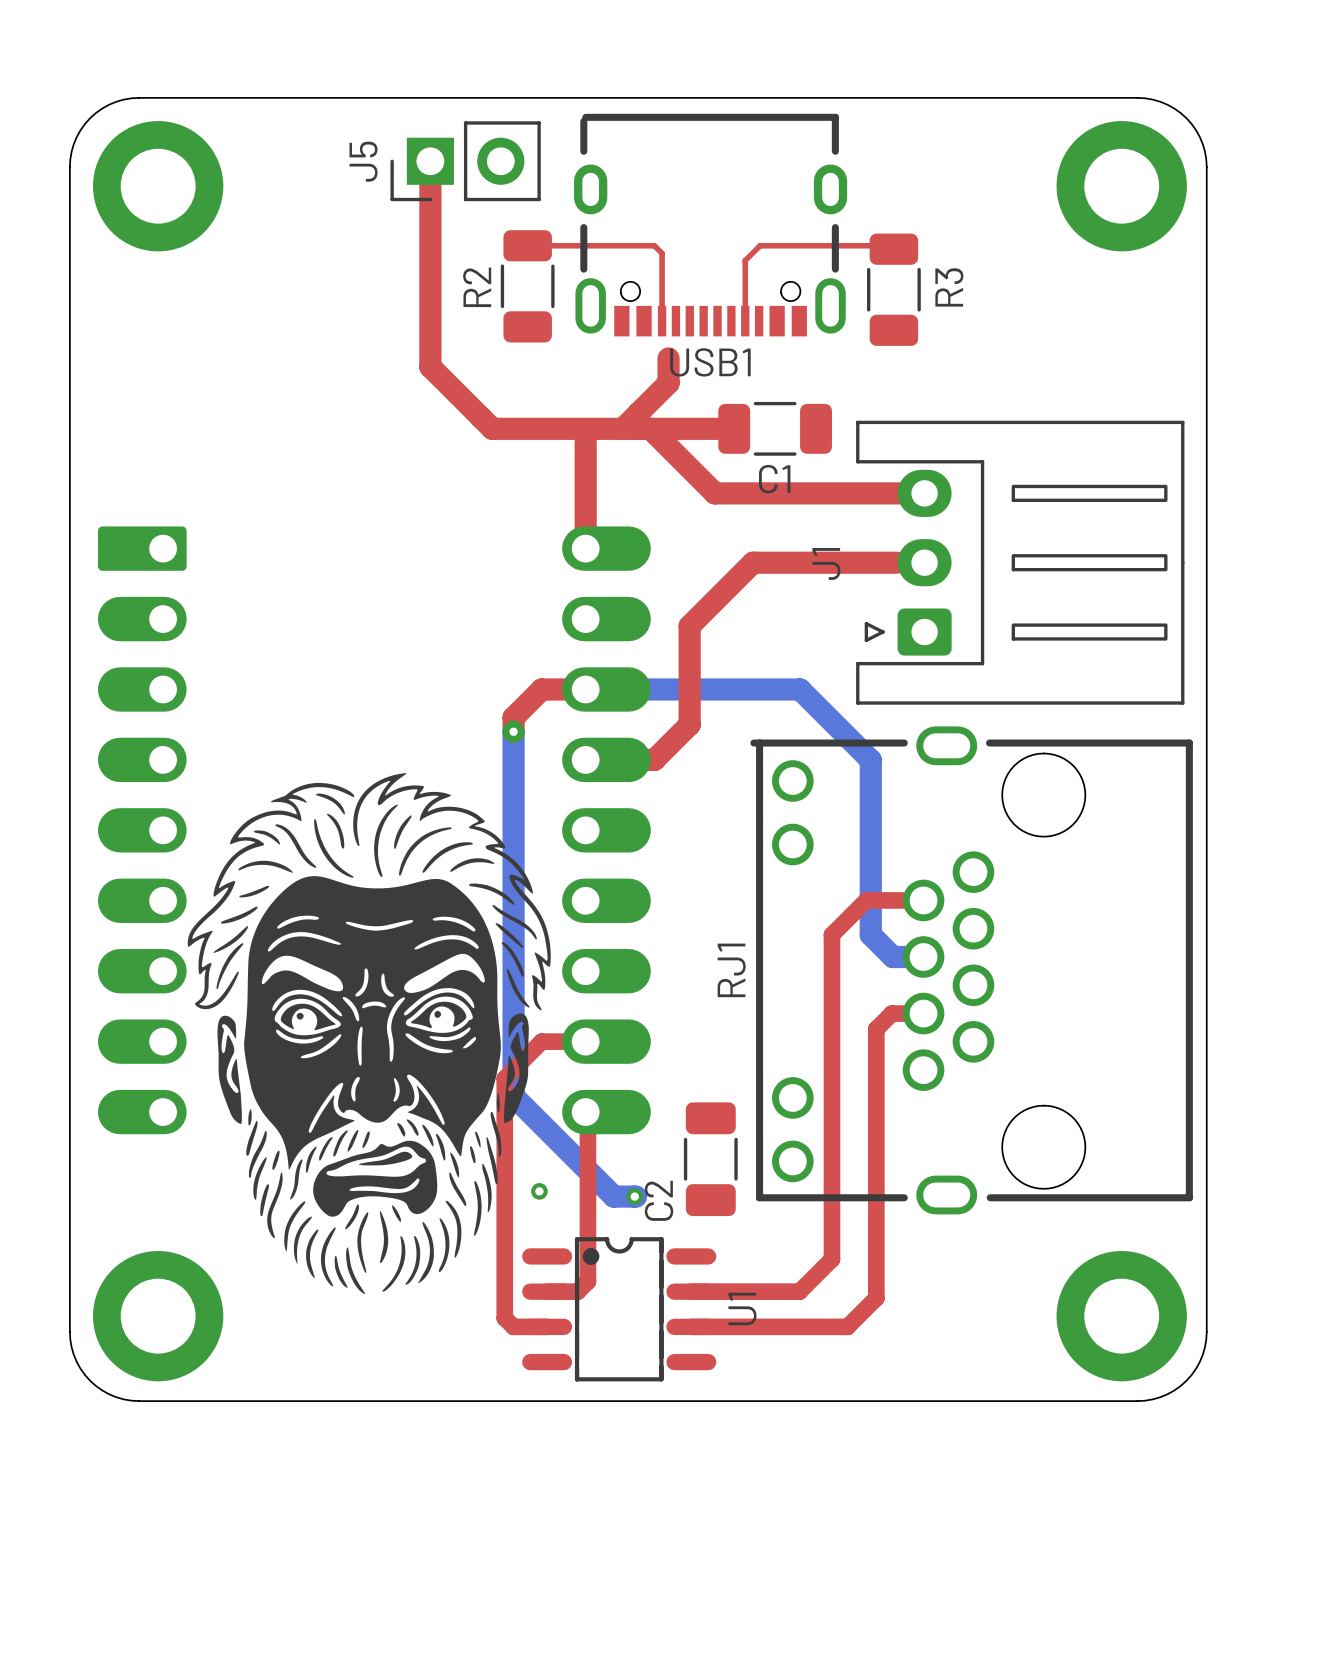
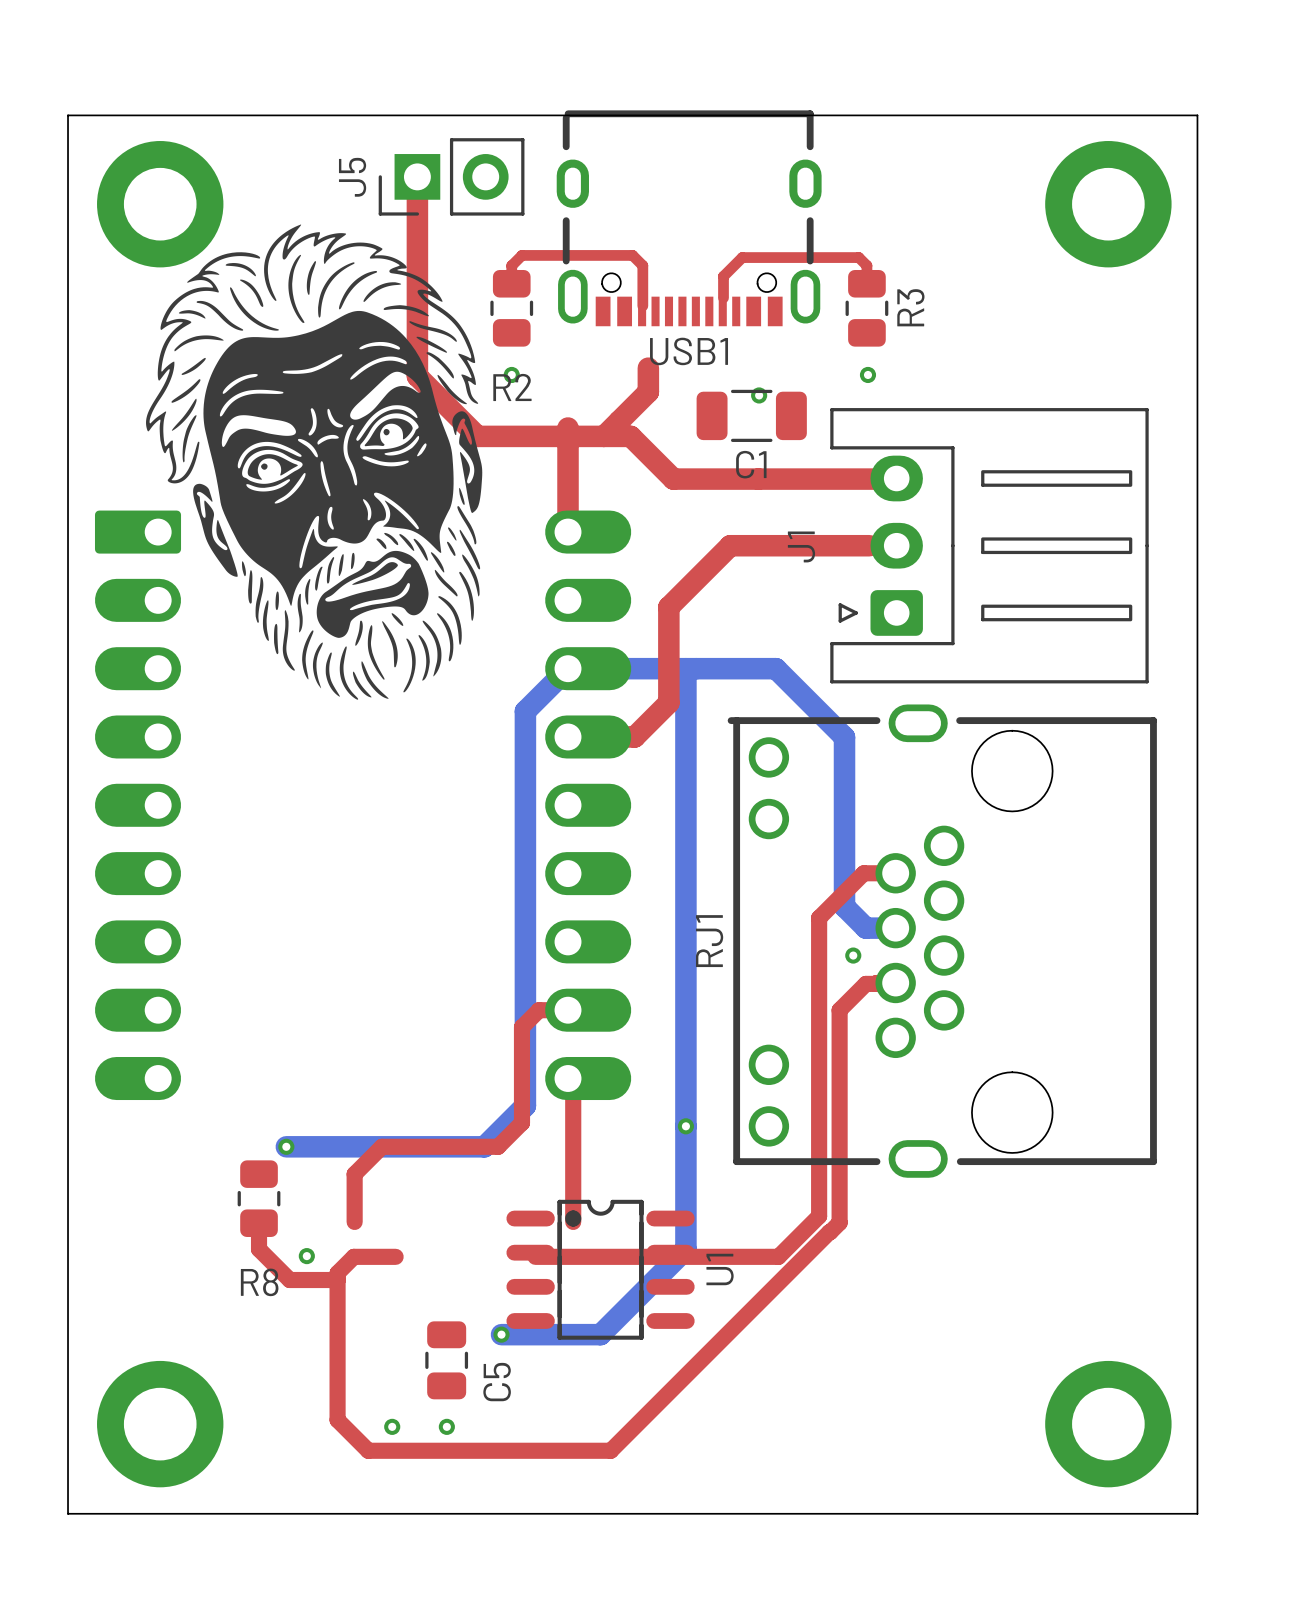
board edge: (139, 97) (1137, 97) (1152, 99) (1167, 104) (1180, 112) (1191, 123) (1202, 144) (1206, 167) (1206, 1331) (1205, 1347) (1199, 1361) (1191, 1375) (1180, 1385) (1160, 1397) (1137, 1401) (139, 1401) (123, 1399) (109, 1394) (95, 1385) (85, 1375) (73, 1354) (69, 1331) (69, 167) (71, 151) (76, 137) (90, 118) (102, 108) (116, 101) (139, 97) -> (68, 115) (68, 1513) (1197, 1513) (1197, 115) (68, 115)
J5 position: (465, 161) -> (451, 176)
part position: (158, 186) -> (160, 204)
part position: (1121, 186) -> (1108, 204)
R2 footprint: [500, 230, 555, 343] -> [490, 269, 534, 347]
drawing: none -> [146, 224, 483, 700]
R3 footprint: [867, 233, 921, 346] -> [845, 269, 889, 347]
top track: (527, 245) (654, 245) (662, 253) (662, 321) -> none
top track: (886, 252) (879, 245) (760, 245) (745, 260) (745, 321) -> none
R2 name position: R2 (477, 287) -> R2 (512, 387)
top track: none -> (511, 283) (511, 265) (521, 255) (632, 255) (642, 265) (642, 305)
top track: none -> (866, 283) (866, 265) (858, 257) (742, 257) (723, 276) (723, 297)
top track: (668, 358) (668, 379) -> none
top track: (430, 366) (492, 428) (734, 428) -> (417, 355) (417, 376) (477, 436) (630, 436) (673, 479) (896, 478)
top track: (668, 383) (622, 428) -> (648, 371) (648, 392) (604, 436)
via: none -> (511, 374)
via: none -> (867, 374)
via: none -> (759, 395)
top track: (650, 428) (714, 493) (924, 493) -> none
top track: (585, 689) (541, 689) (513, 717) (513, 731) -> none
bottom track: none -> (568, 668) (525, 711) (525, 1105) (484, 1146) (286, 1146)
bottom track: none -> (685, 668) (685, 1249) (600, 1334) (501, 1334)
bottom track: (513, 731) (513, 1096) (613, 1196) (636, 1196) -> none
via: (513, 731) -> none
drawing: [187, 773, 551, 1295] -> none
top track: (890, 900) (866, 900) (831, 934) (831, 1259) (799, 1291) (691, 1291) -> (863, 873) (819, 917) (819, 1216) (778, 1256) (535, 1256)
via: none -> (853, 955)
top track: (904, 1013) (891, 1013) (876, 1029) (876, 1298) (847, 1326) (691, 1326) -> (876, 982) (865, 983) (839, 1010) (839, 1222) (610, 1450) (368, 1450) (337, 1420) (337, 1273) (353, 1256) (395, 1256)
drawing position: (437, 1014) -> (386, 432)
drawing position: (300, 1016) -> (264, 466)
top track: (555, 1041) (541, 1041) (504, 1078) (504, 1318) (513, 1326) (547, 1326) -> (539, 1010) (521, 1027) (521, 1122) (498, 1146) (381, 1146) (354, 1174) (354, 1221)
top track: (587, 1114) (587, 1281) (577, 1291) (547, 1291) -> (570, 1080) (573, 1083) (573, 1221)
C2: (710, 1159) -> none
via: none -> (286, 1146)
via: (539, 1191) -> none
via position: (634, 1196) -> (685, 1126)
R8: none -> (259, 1198)
top track: none -> (259, 1223) (259, 1249) (289, 1280) (337, 1280)
via: none -> (306, 1256)
part position: (158, 1316) -> (160, 1424)
part position: (1121, 1316) -> (1108, 1424)
via: none -> (501, 1334)
C5: none -> (446, 1360)
via: none -> (392, 1426)
via: none -> (446, 1426)

